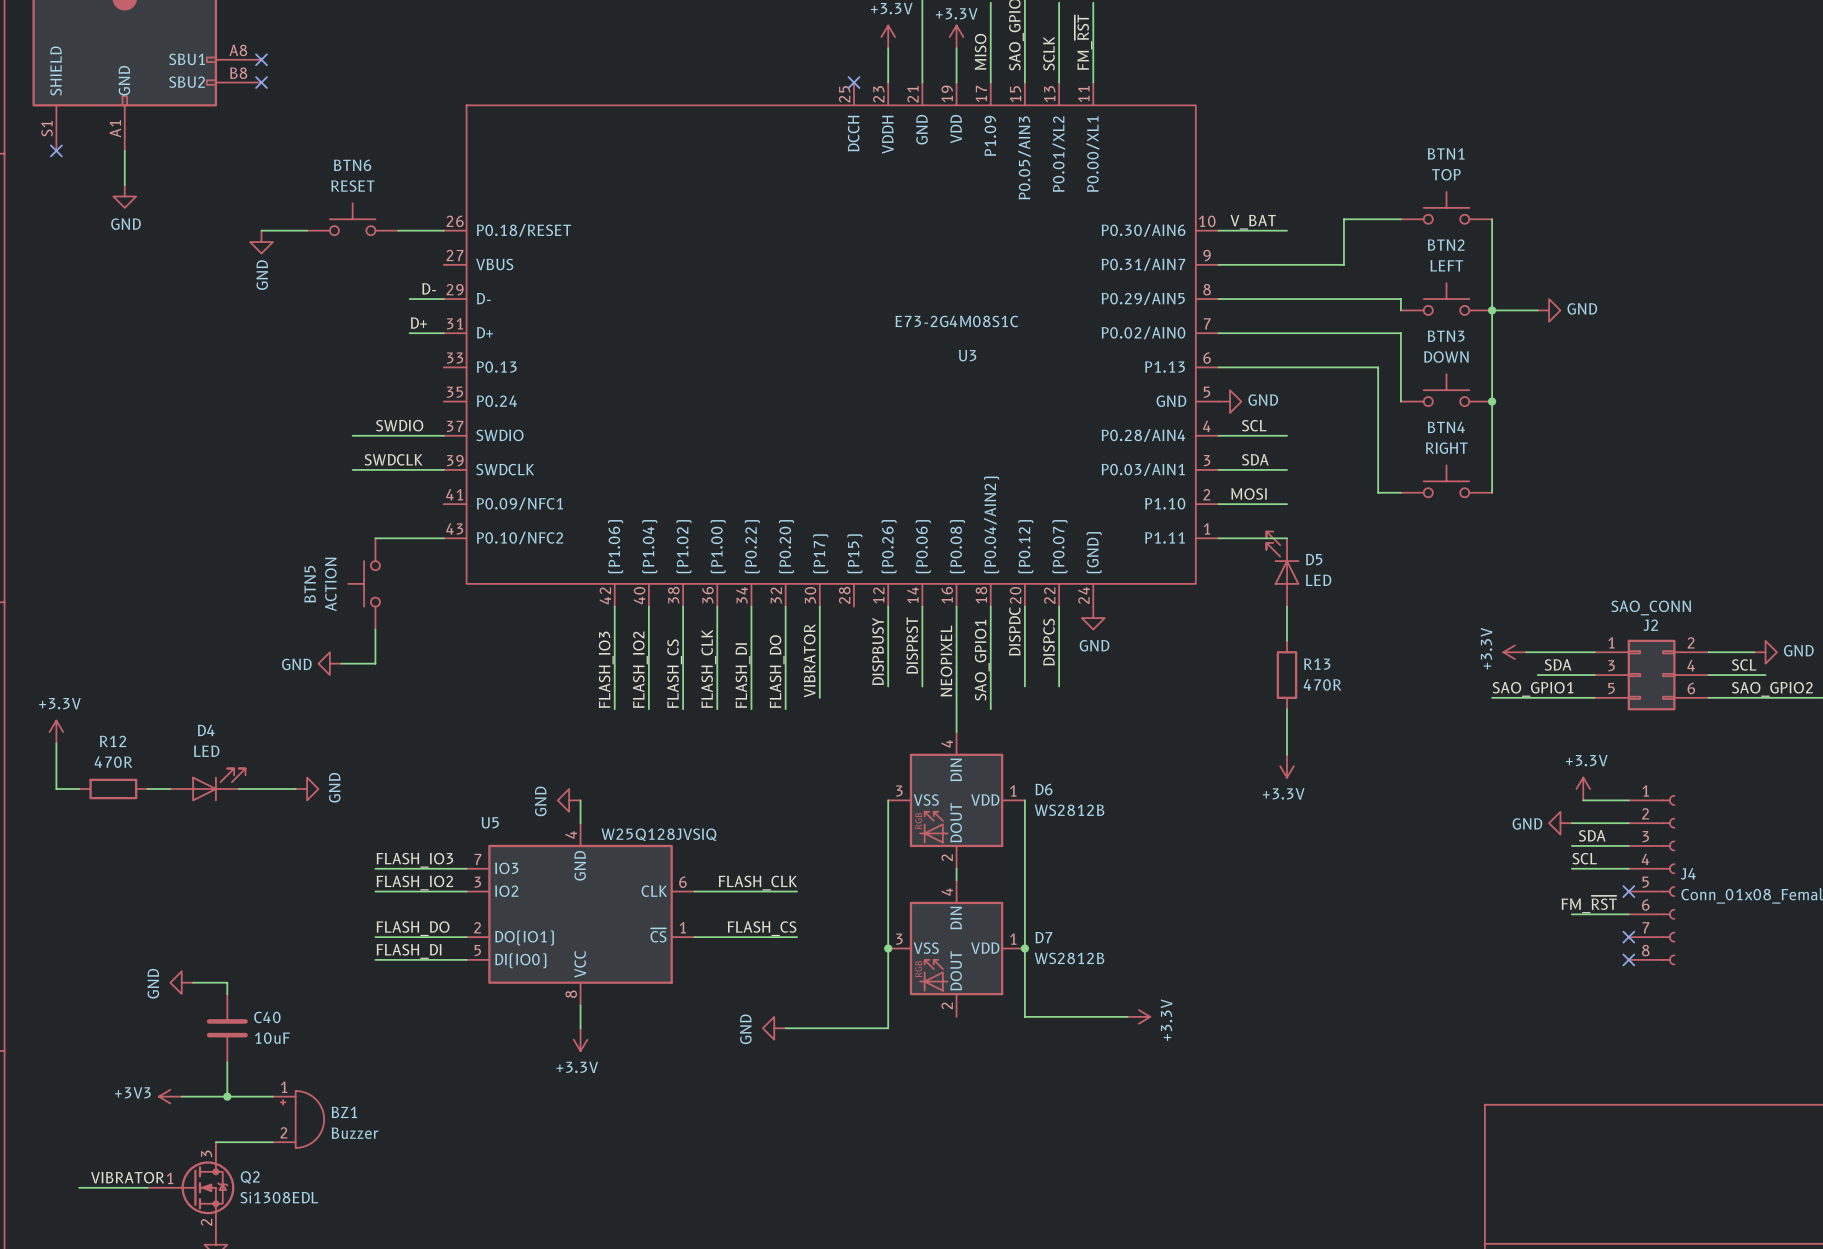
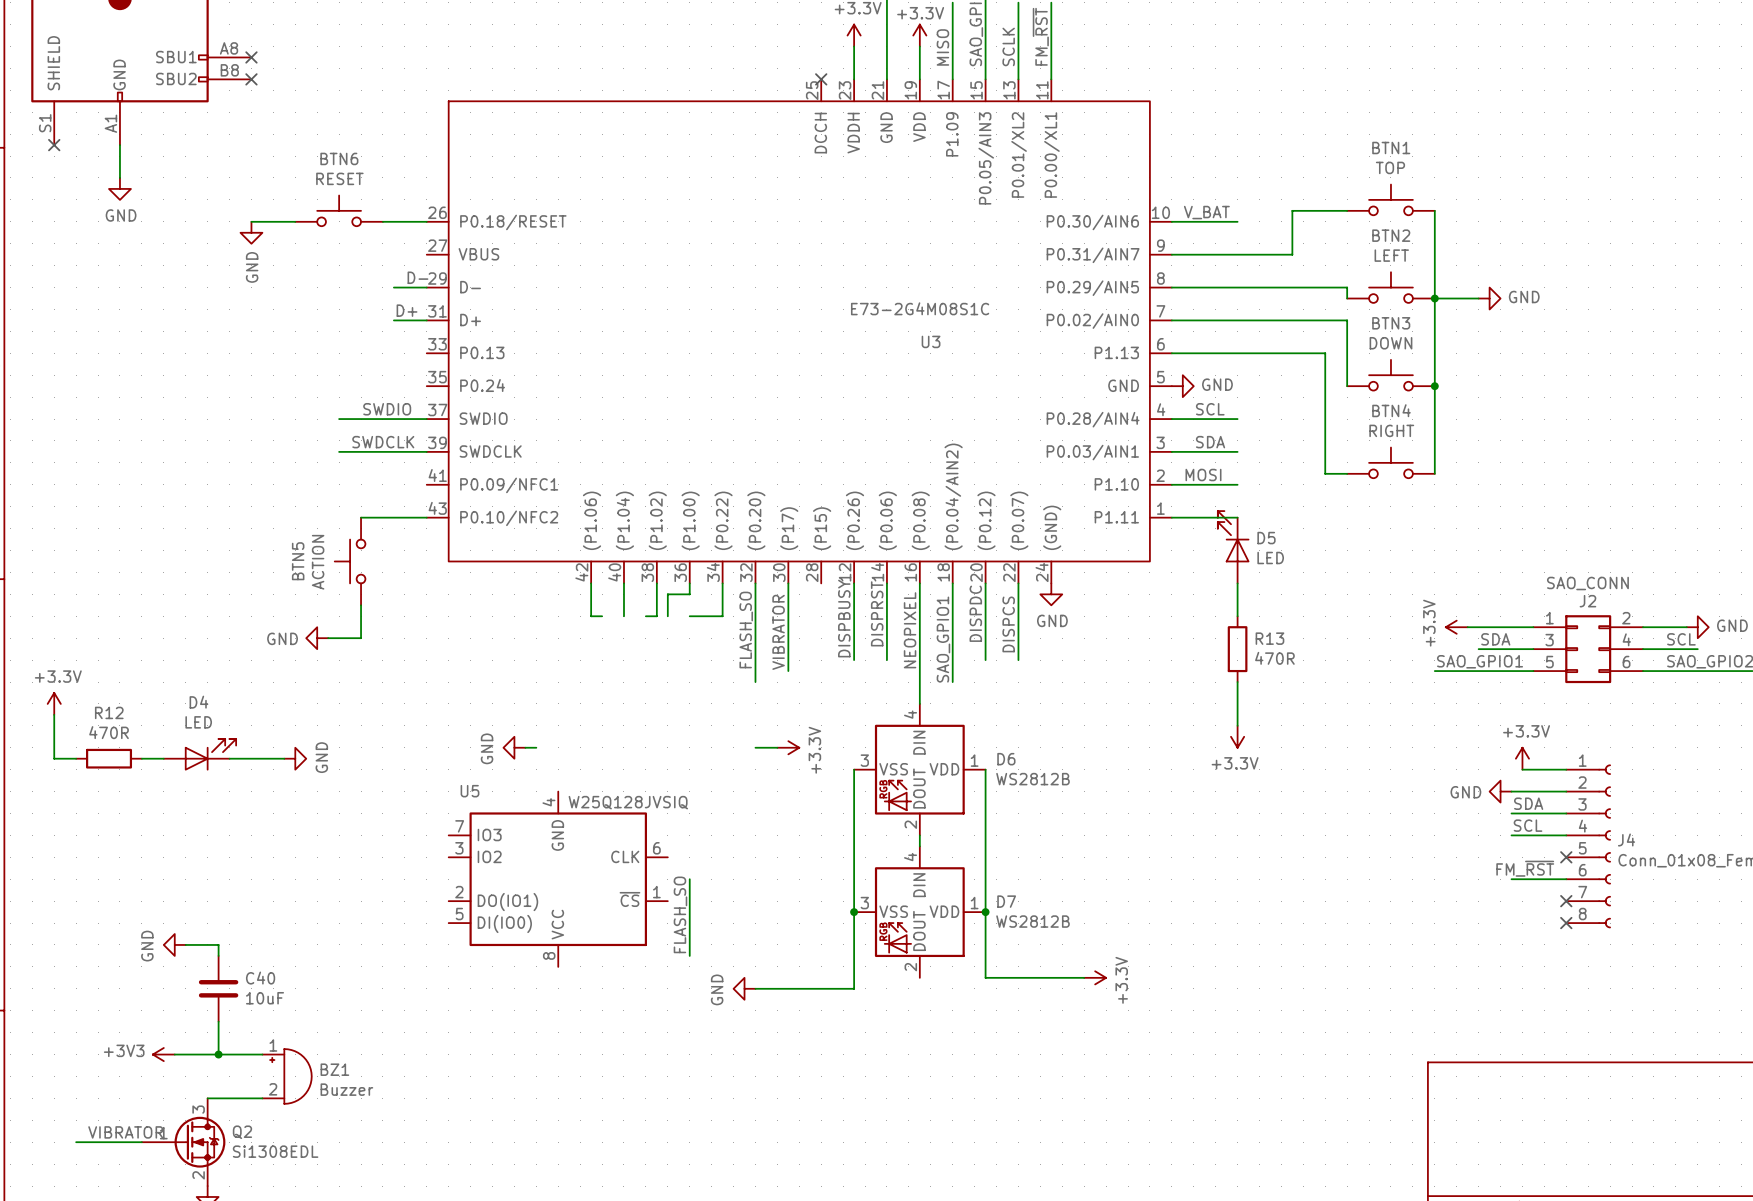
wire: (717, 618) (717, 709) -> (689, 594) (667, 594) (667, 616)
wire: (614, 640) (614, 709) -> (591, 616) (602, 616)
wire: (648, 640) (648, 709) -> none
wire: (683, 640) (683, 709) -> (656, 616) (645, 616)
wire: (751, 640) (751, 709) -> (722, 616) (689, 616)
label: FLASH_CLK (708, 668) -> none
label: FLASH_IO3 (606, 669) -> none
label: FLASH_IO2 (640, 669) -> none
label: FLASH_DO (777, 671) -> FLASH_SO (746, 630)
label: FLASH_CS (674, 673) -> none
label: FLASH_DI (742, 675) -> none
wire: none -> (525, 747) (536, 747)
wire: none -> (755, 747) (777, 747)
power symbol: none -> +3.3V (788, 747)
power symbol position: GND (569, 800) -> GND (514, 747)
wire: (580, 800) (580, 823) -> none
label: FLASH_IO3 (414, 860) -> none
wire: (375, 868) (466, 868) -> none
label: FLASH_IO2 (414, 883) -> none
label: FLASH_CLK (757, 883) -> none
wire: (375, 891) (466, 891) -> none
wire: (694, 891) (797, 891) -> none
wire: none -> (689, 879) (689, 955)
label: FLASH_DO (413, 928) -> none
label: FLASH_CS (762, 928) -> FLASH_SO (680, 914)
wire: (375, 937) (466, 937) -> none
wire: (694, 937) (797, 937) -> none
label: FLASH_DI (409, 951) -> none
wire: (375, 959) (466, 959) -> none
wire: (580, 1005) (580, 1028) -> none
power symbol: +3.3V (580, 1039) -> none

